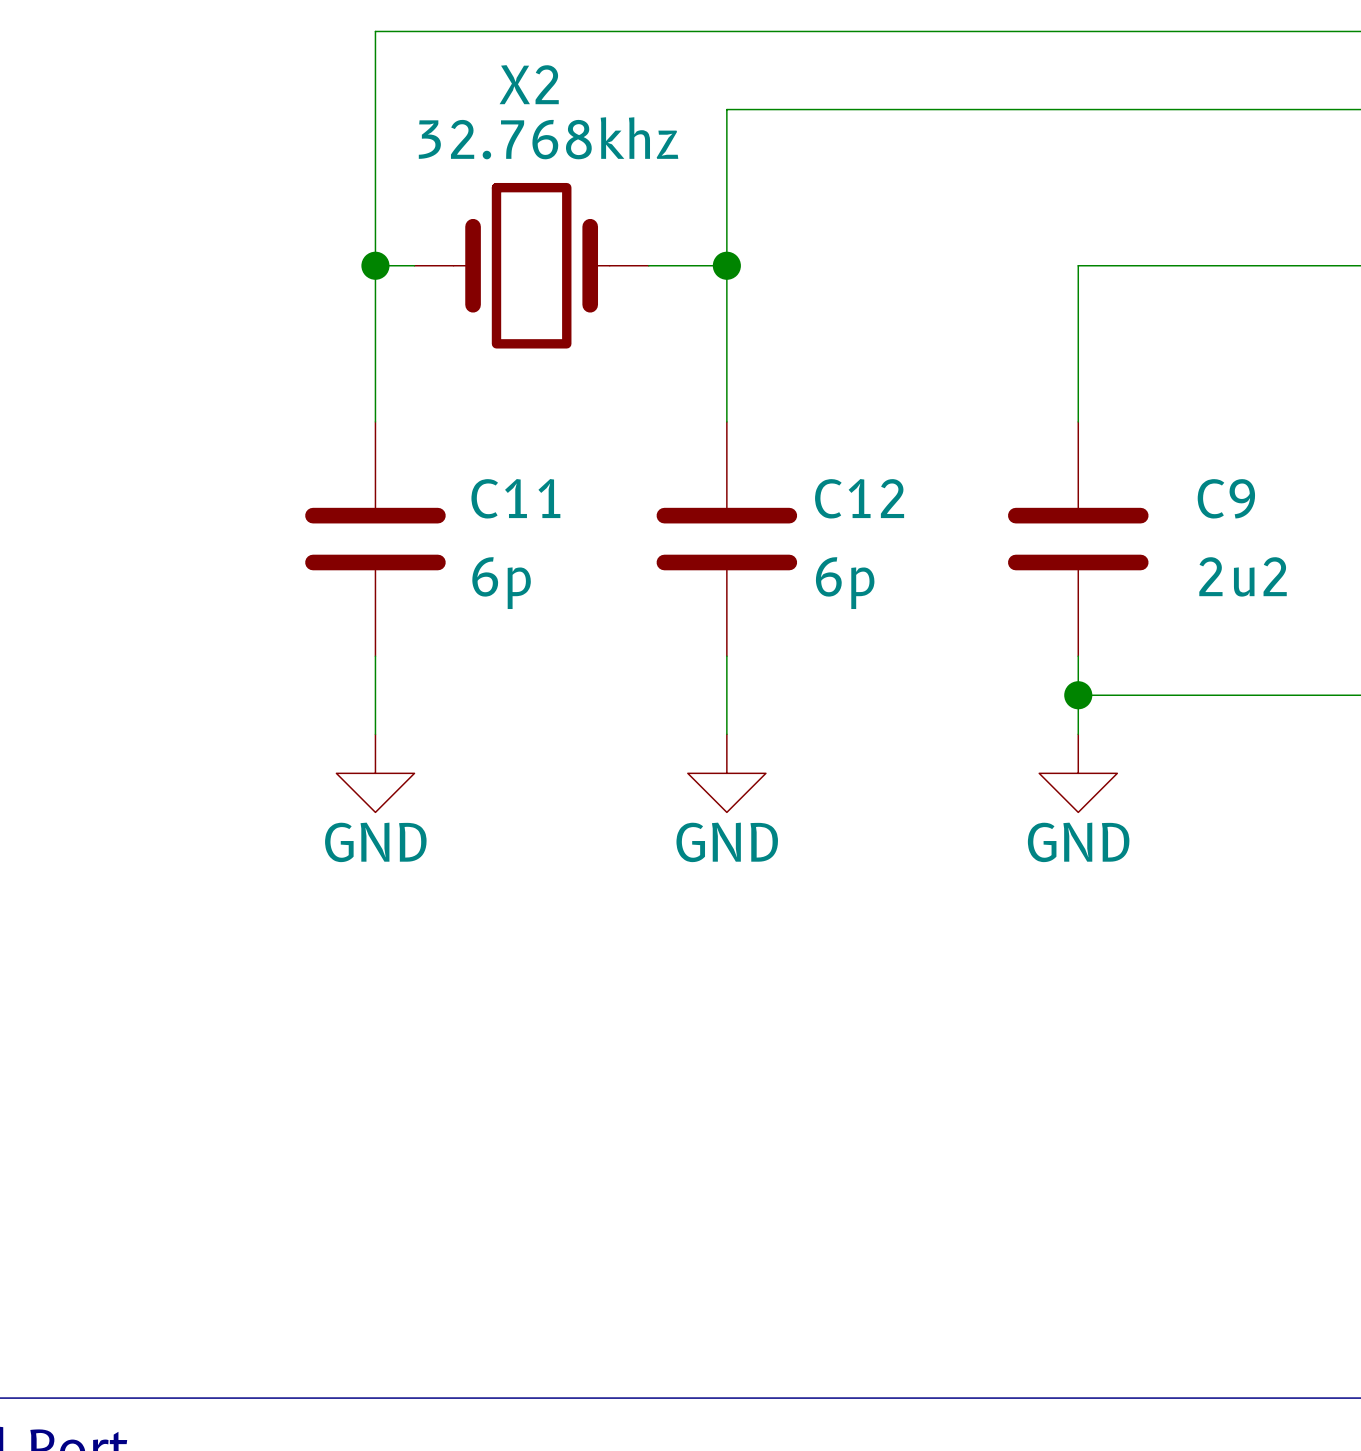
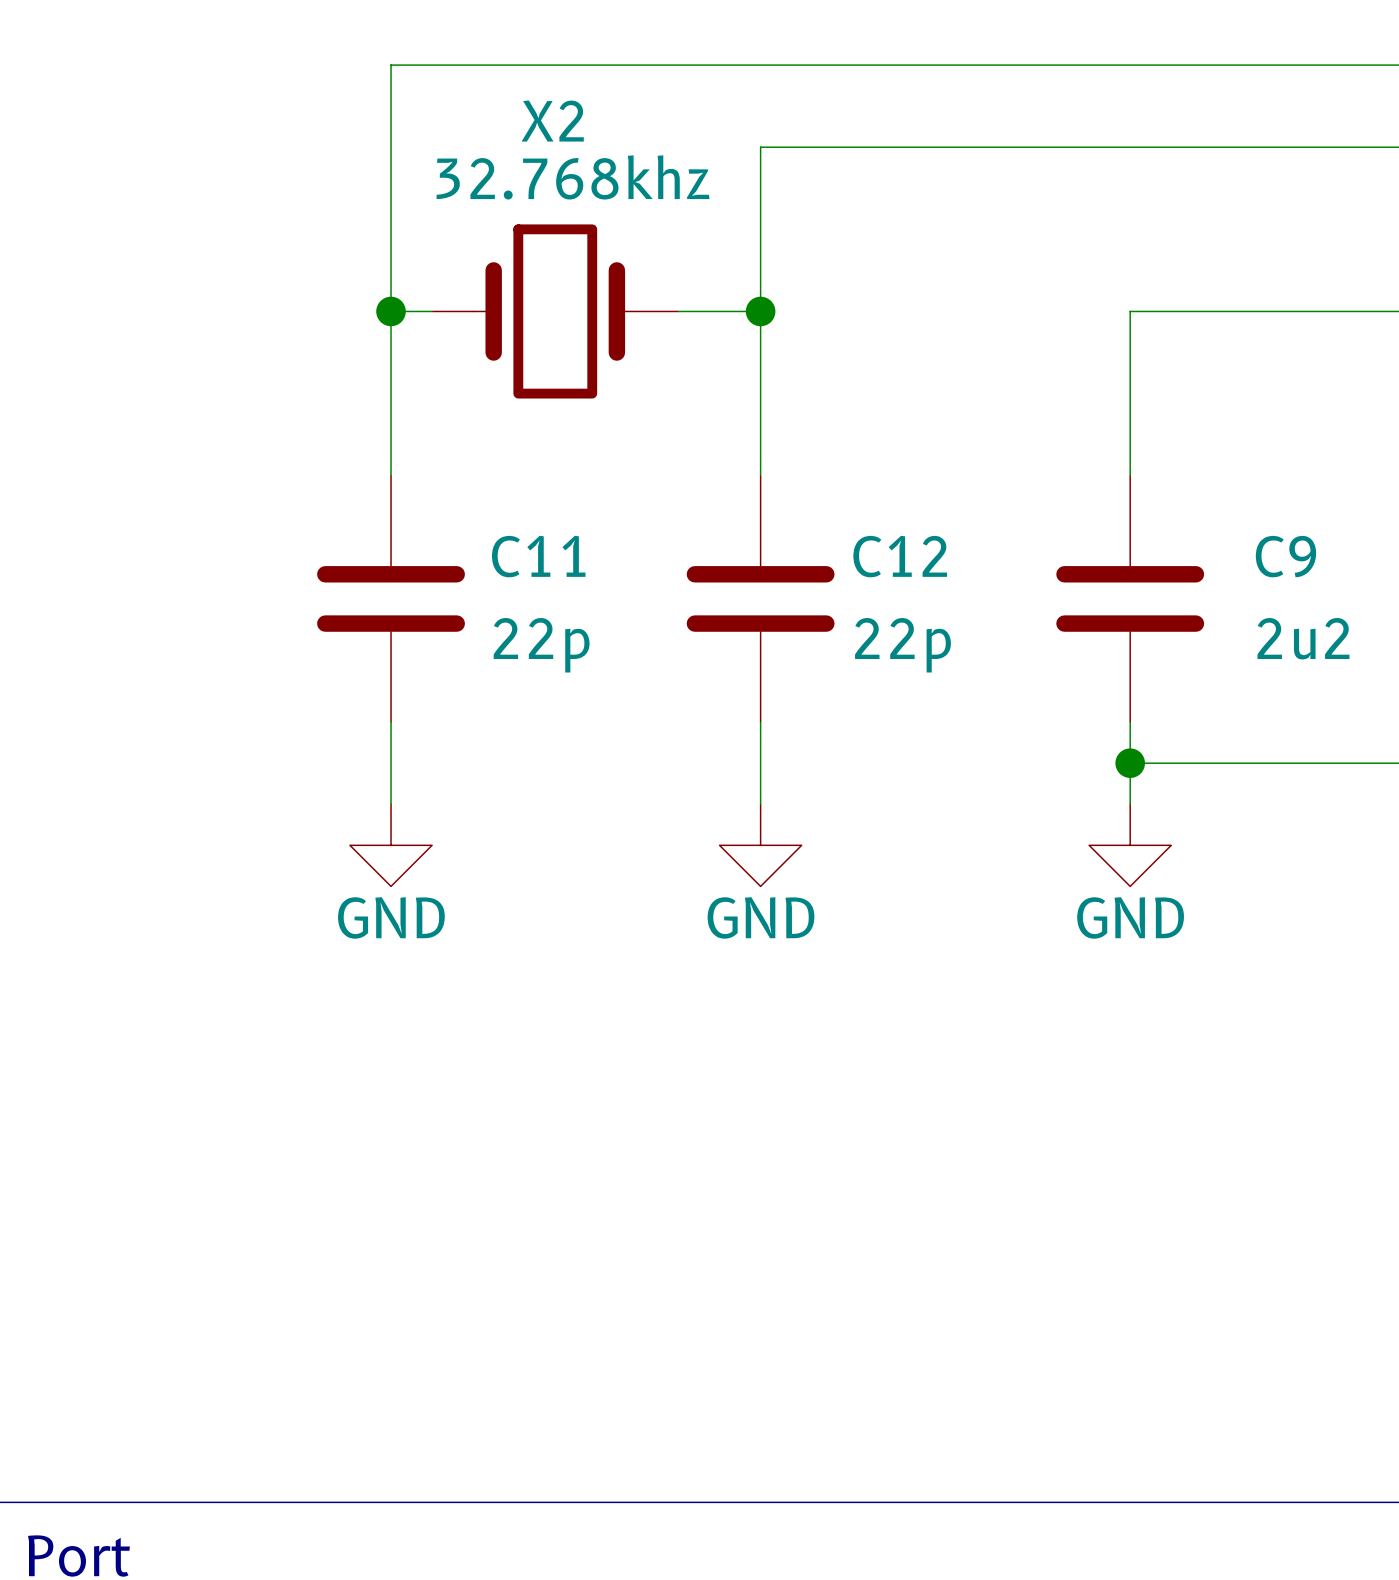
C11 value: 6p (501, 583) -> 22p (541, 645)
C12 value: 6p (845, 583) -> 22p (902, 645)

